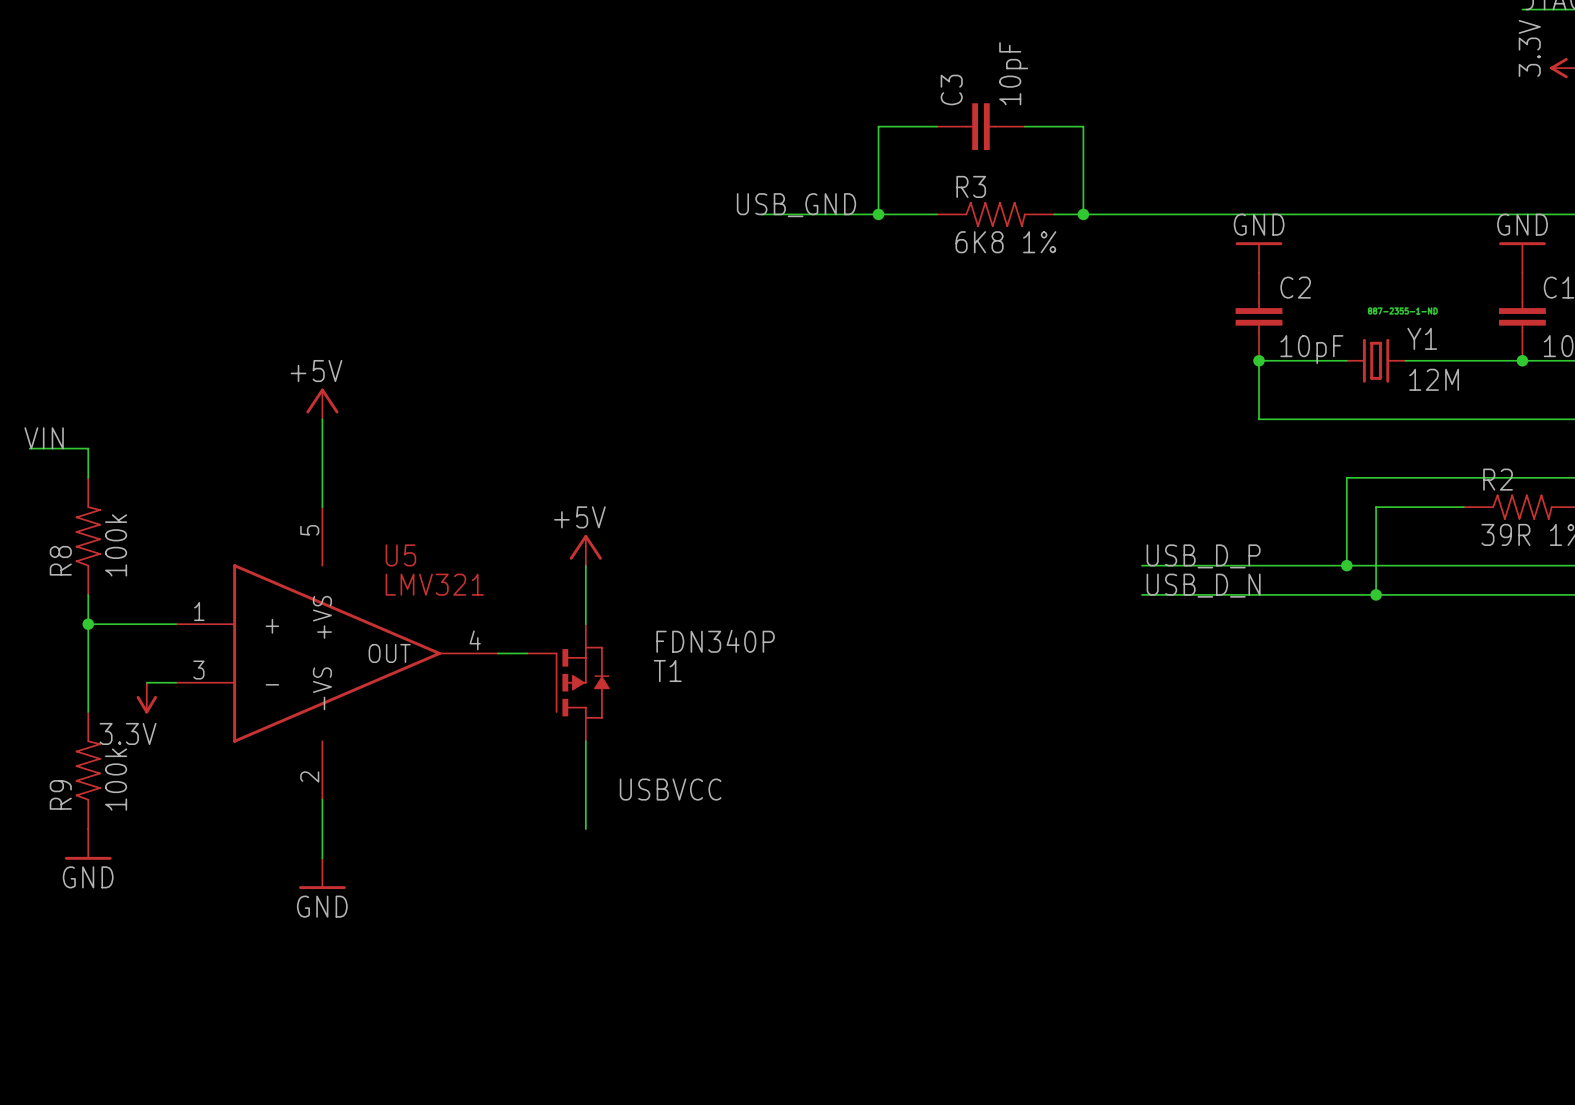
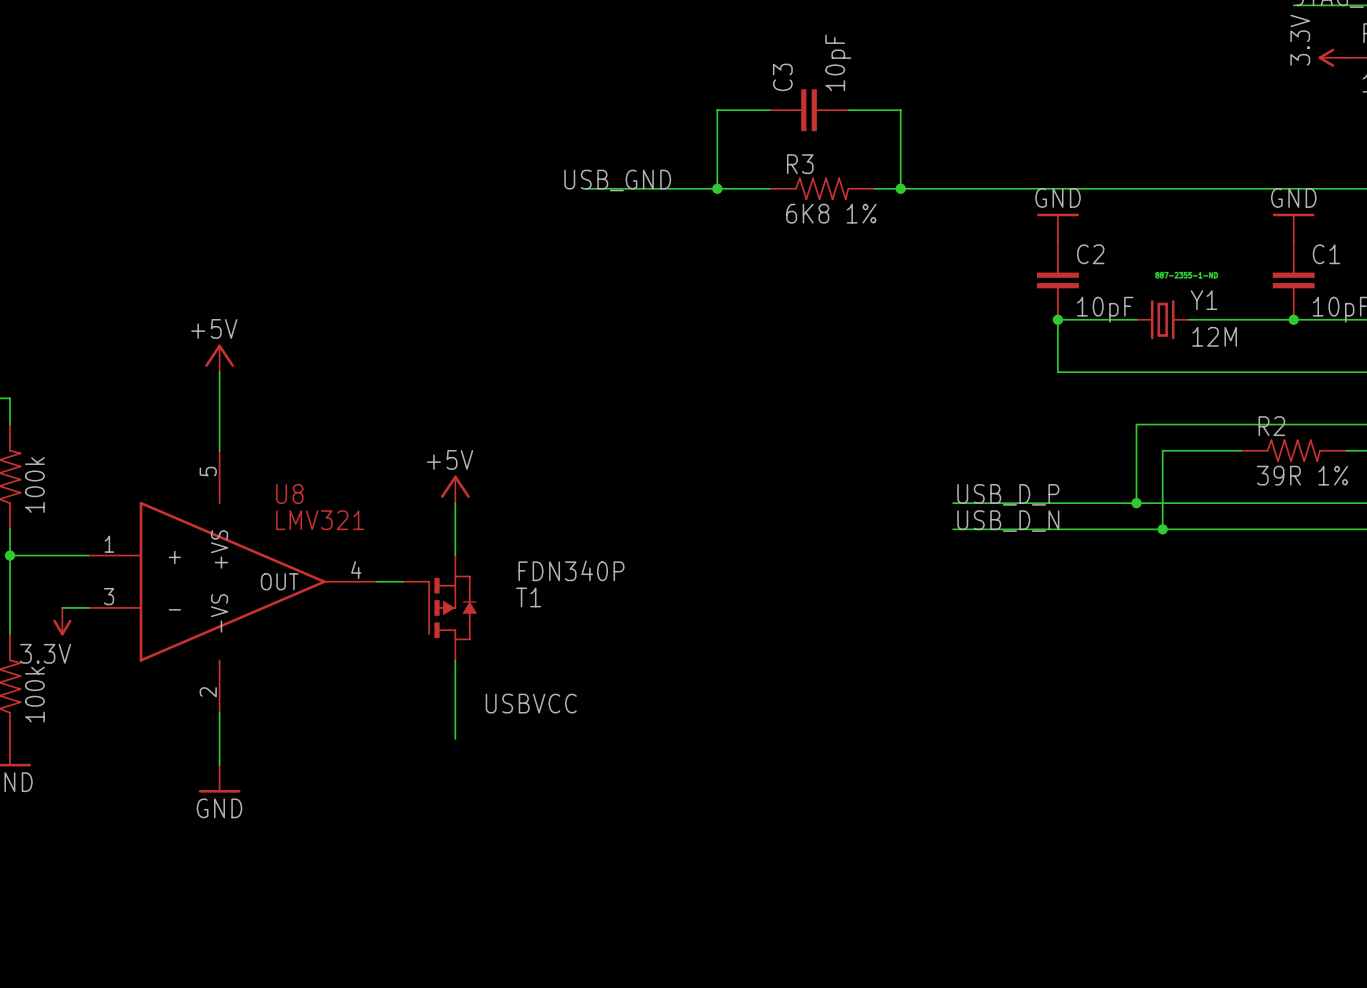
label position: USB_GND (796, 205) -> USB_GND (617, 180)
wire: none -> (586, 188) (612, 188)
U5 name: U5 (400, 555) -> U8 (289, 493)

